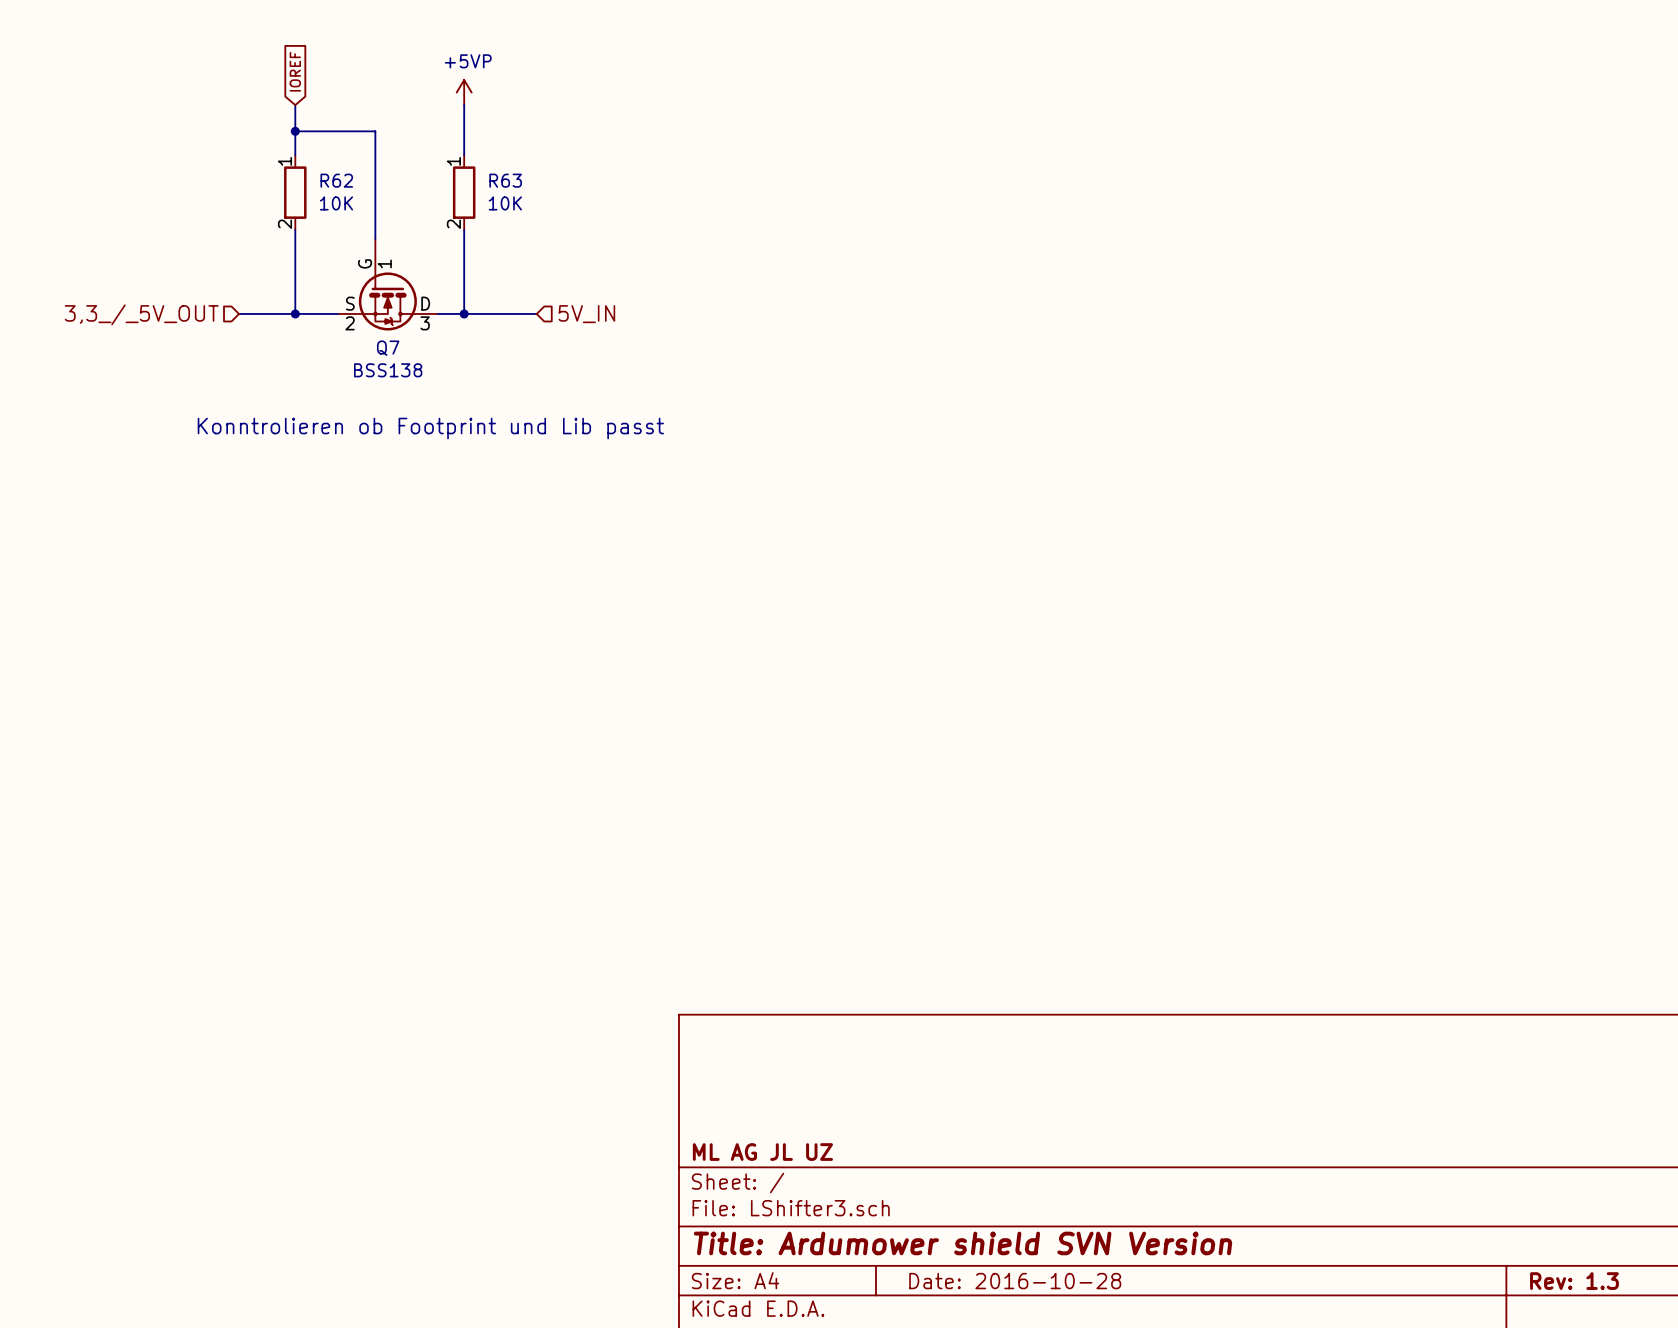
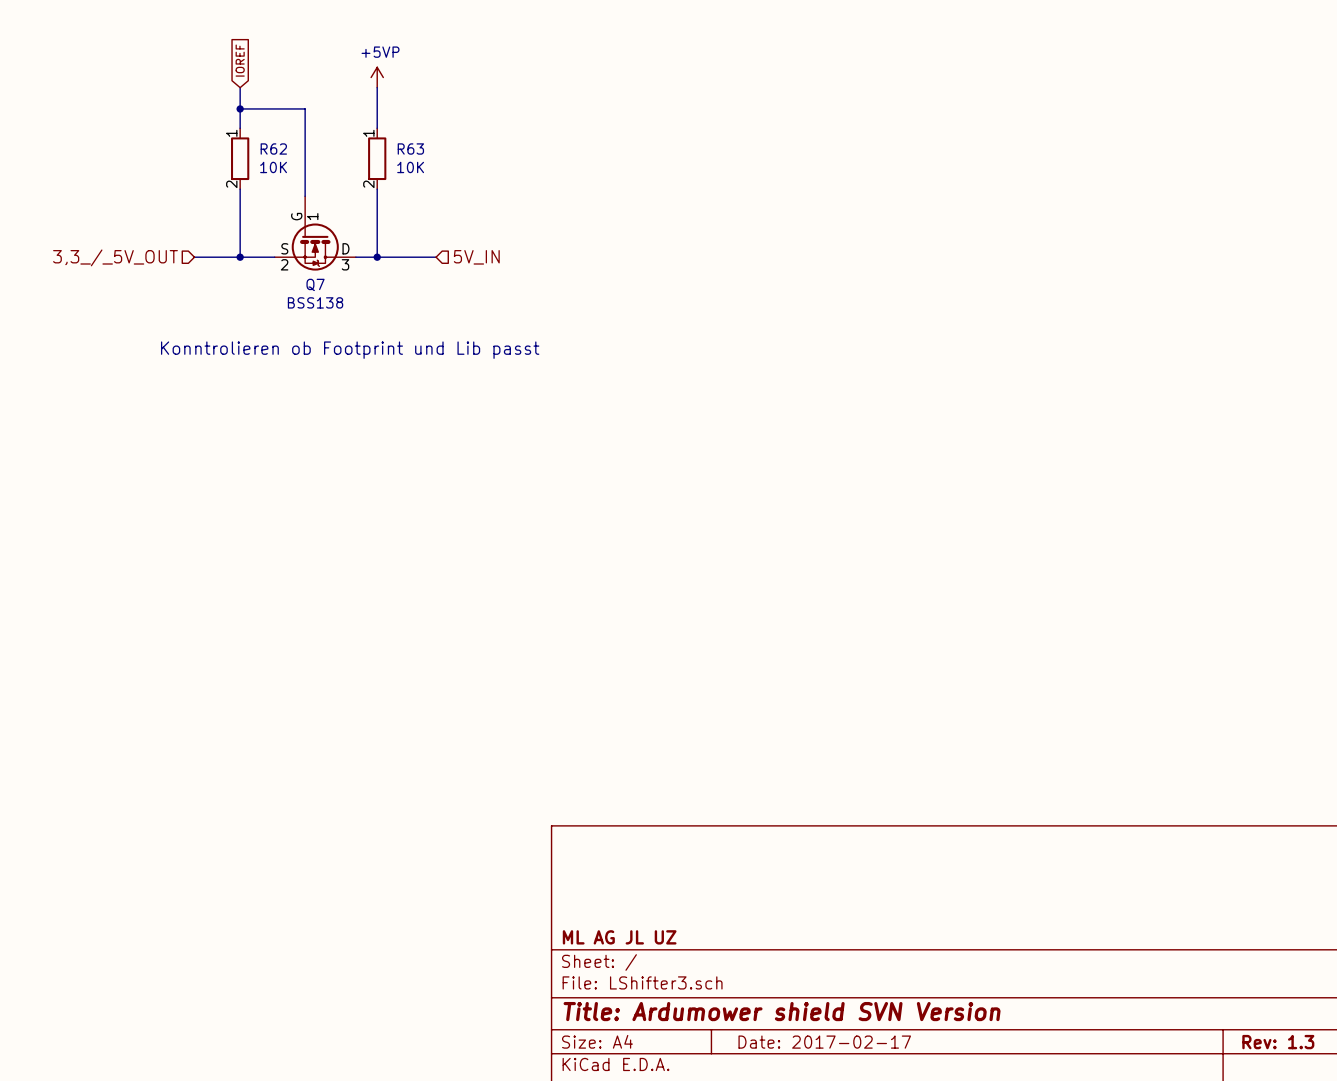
title block: Date: 2016-10-28 (1015, 1281) -> Date: 2017-02-17 (824, 1042)

